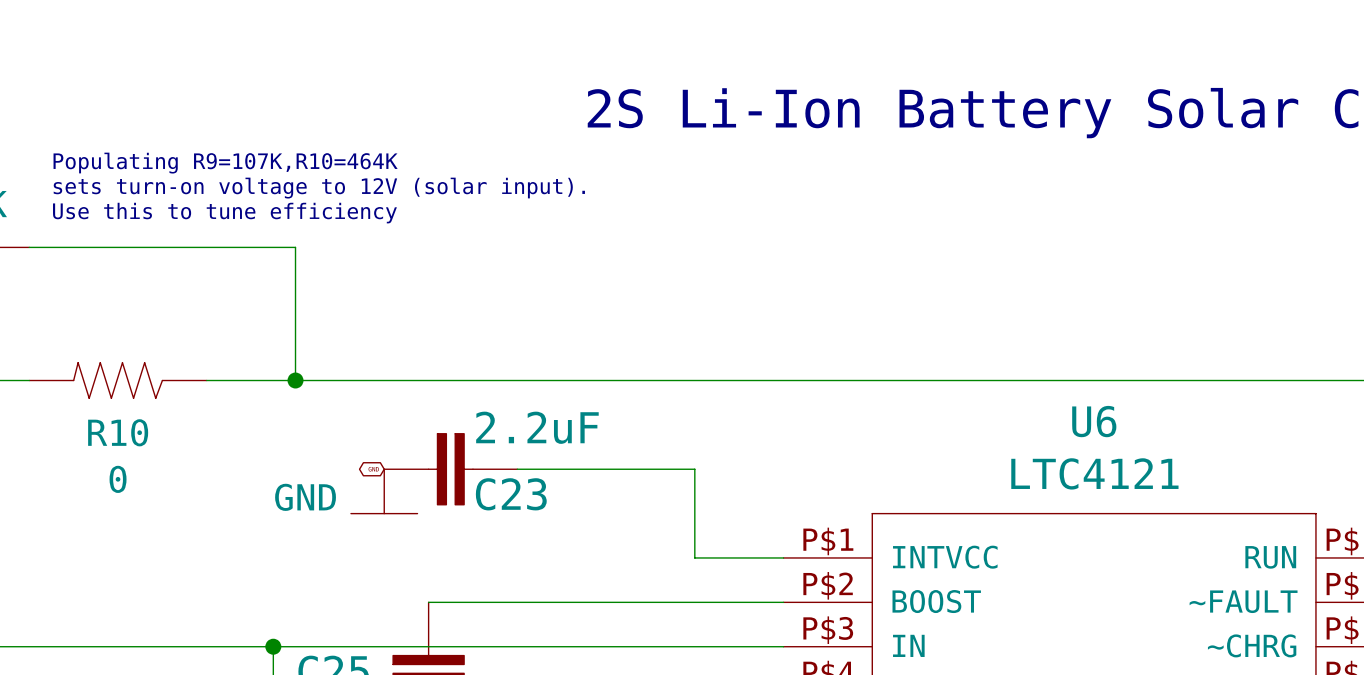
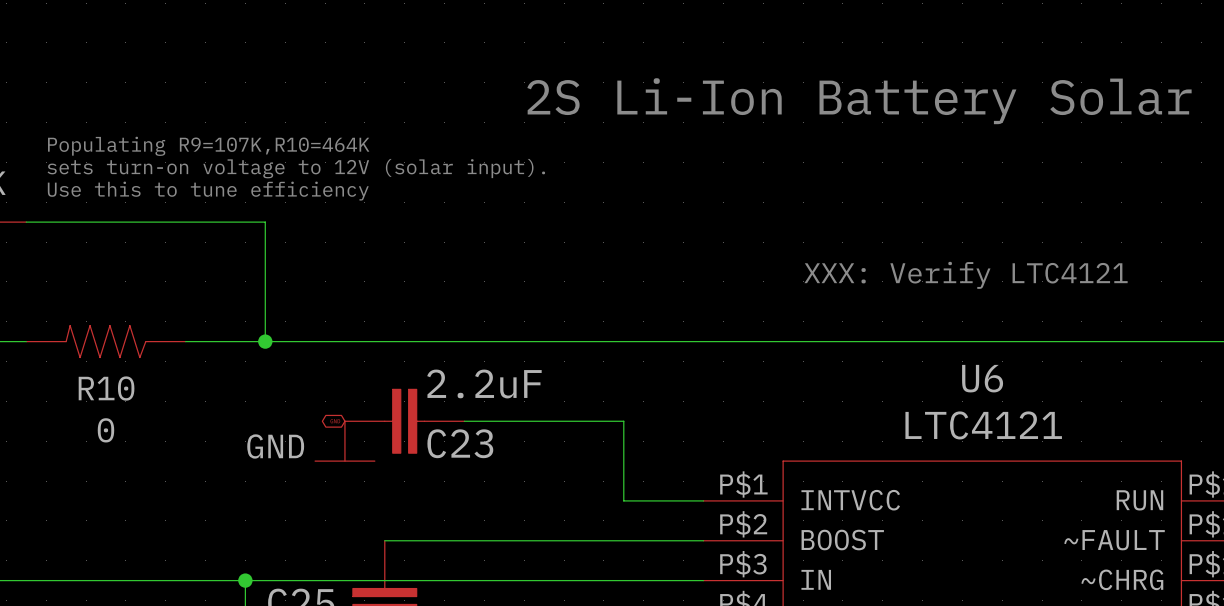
text: none -> XXX: Verify LTC4121 (966, 275)

